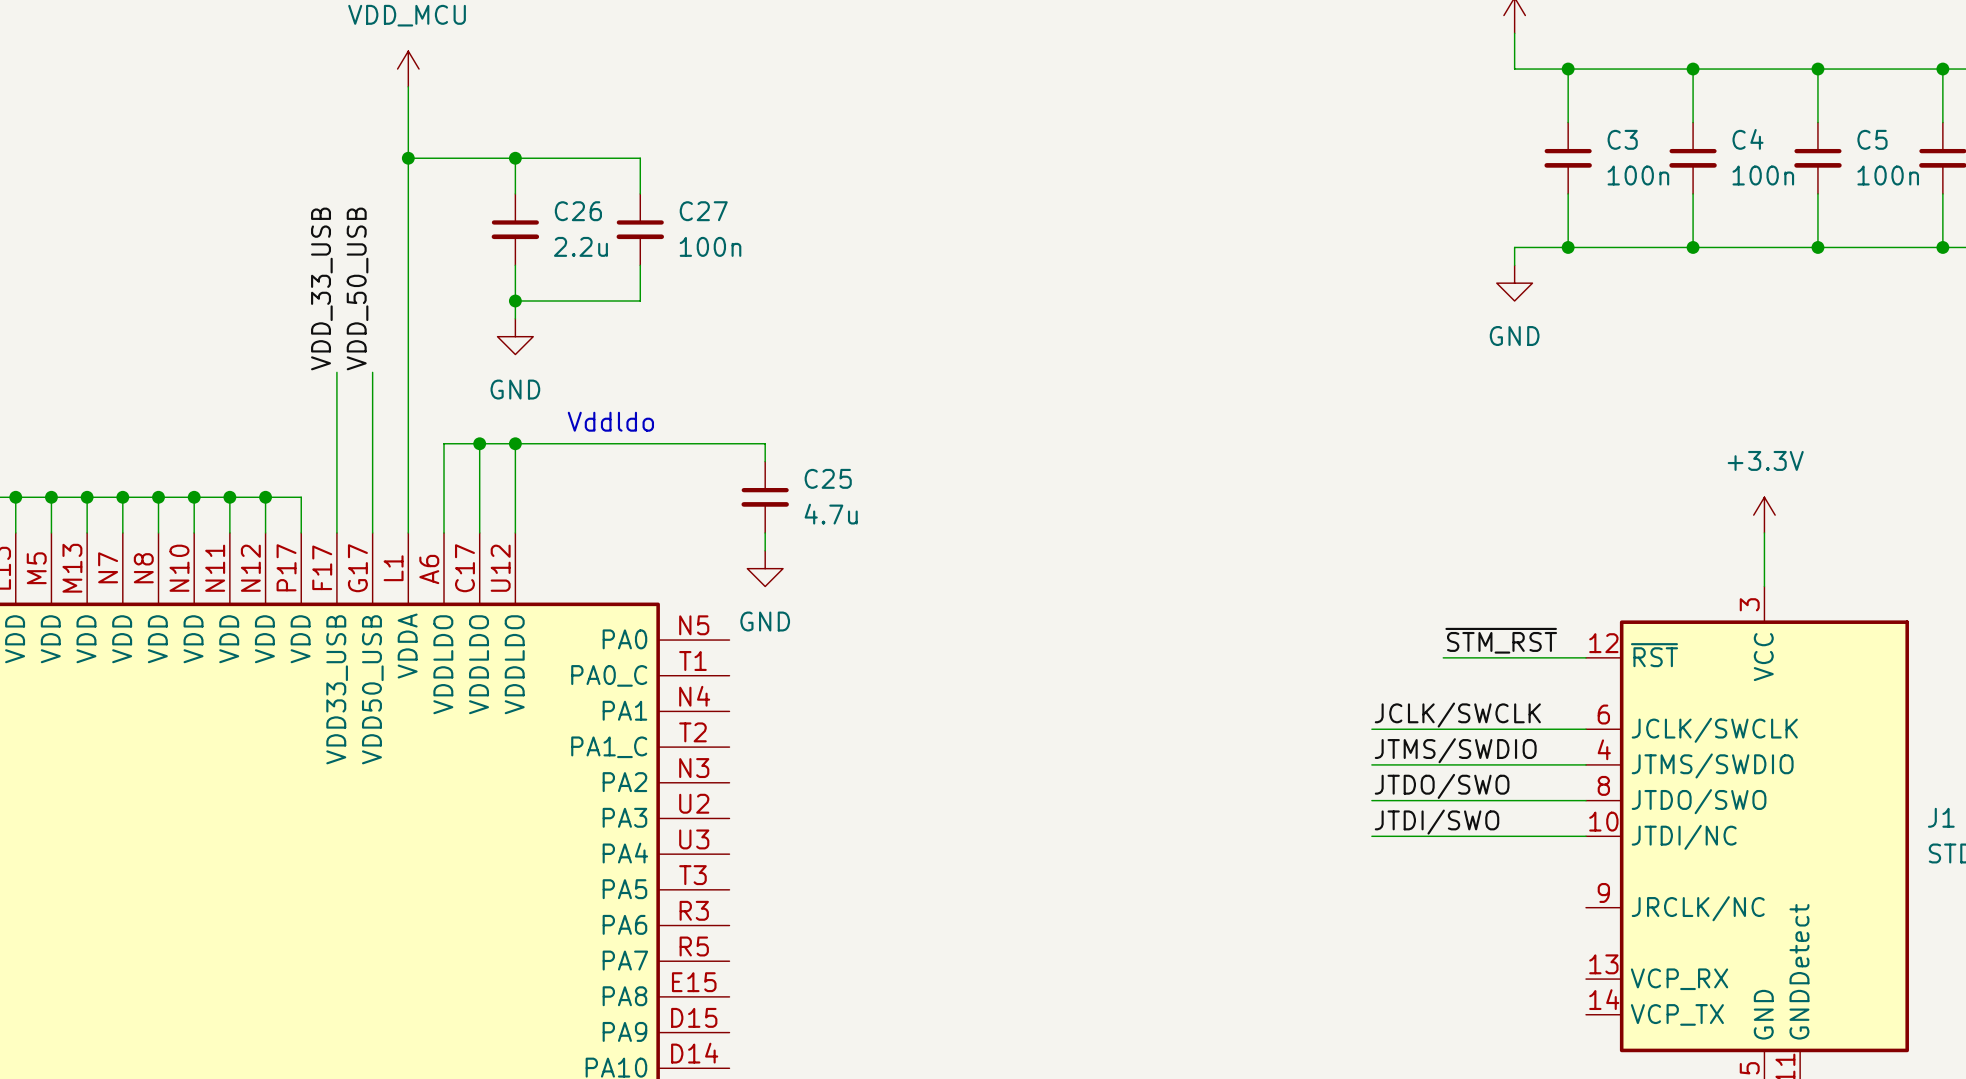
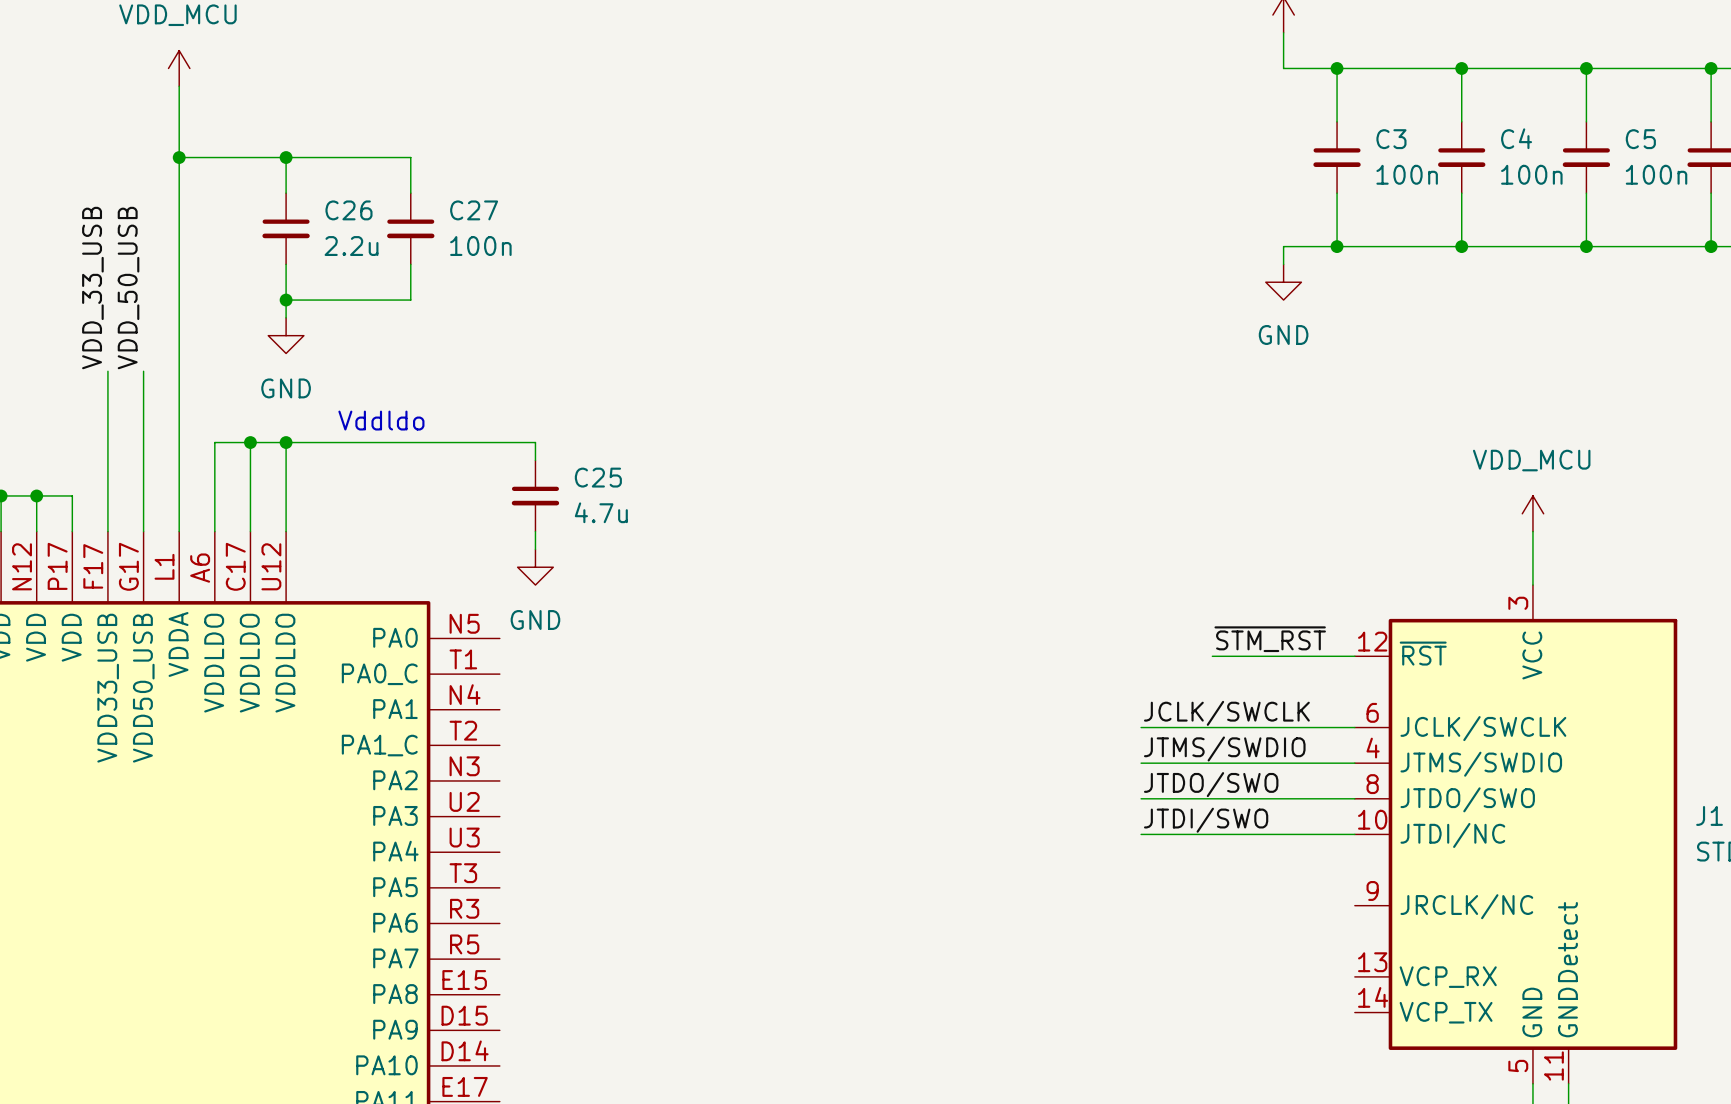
power symbol: +3.3V (1764, 515) -> VDD_MCU (1532, 513)

